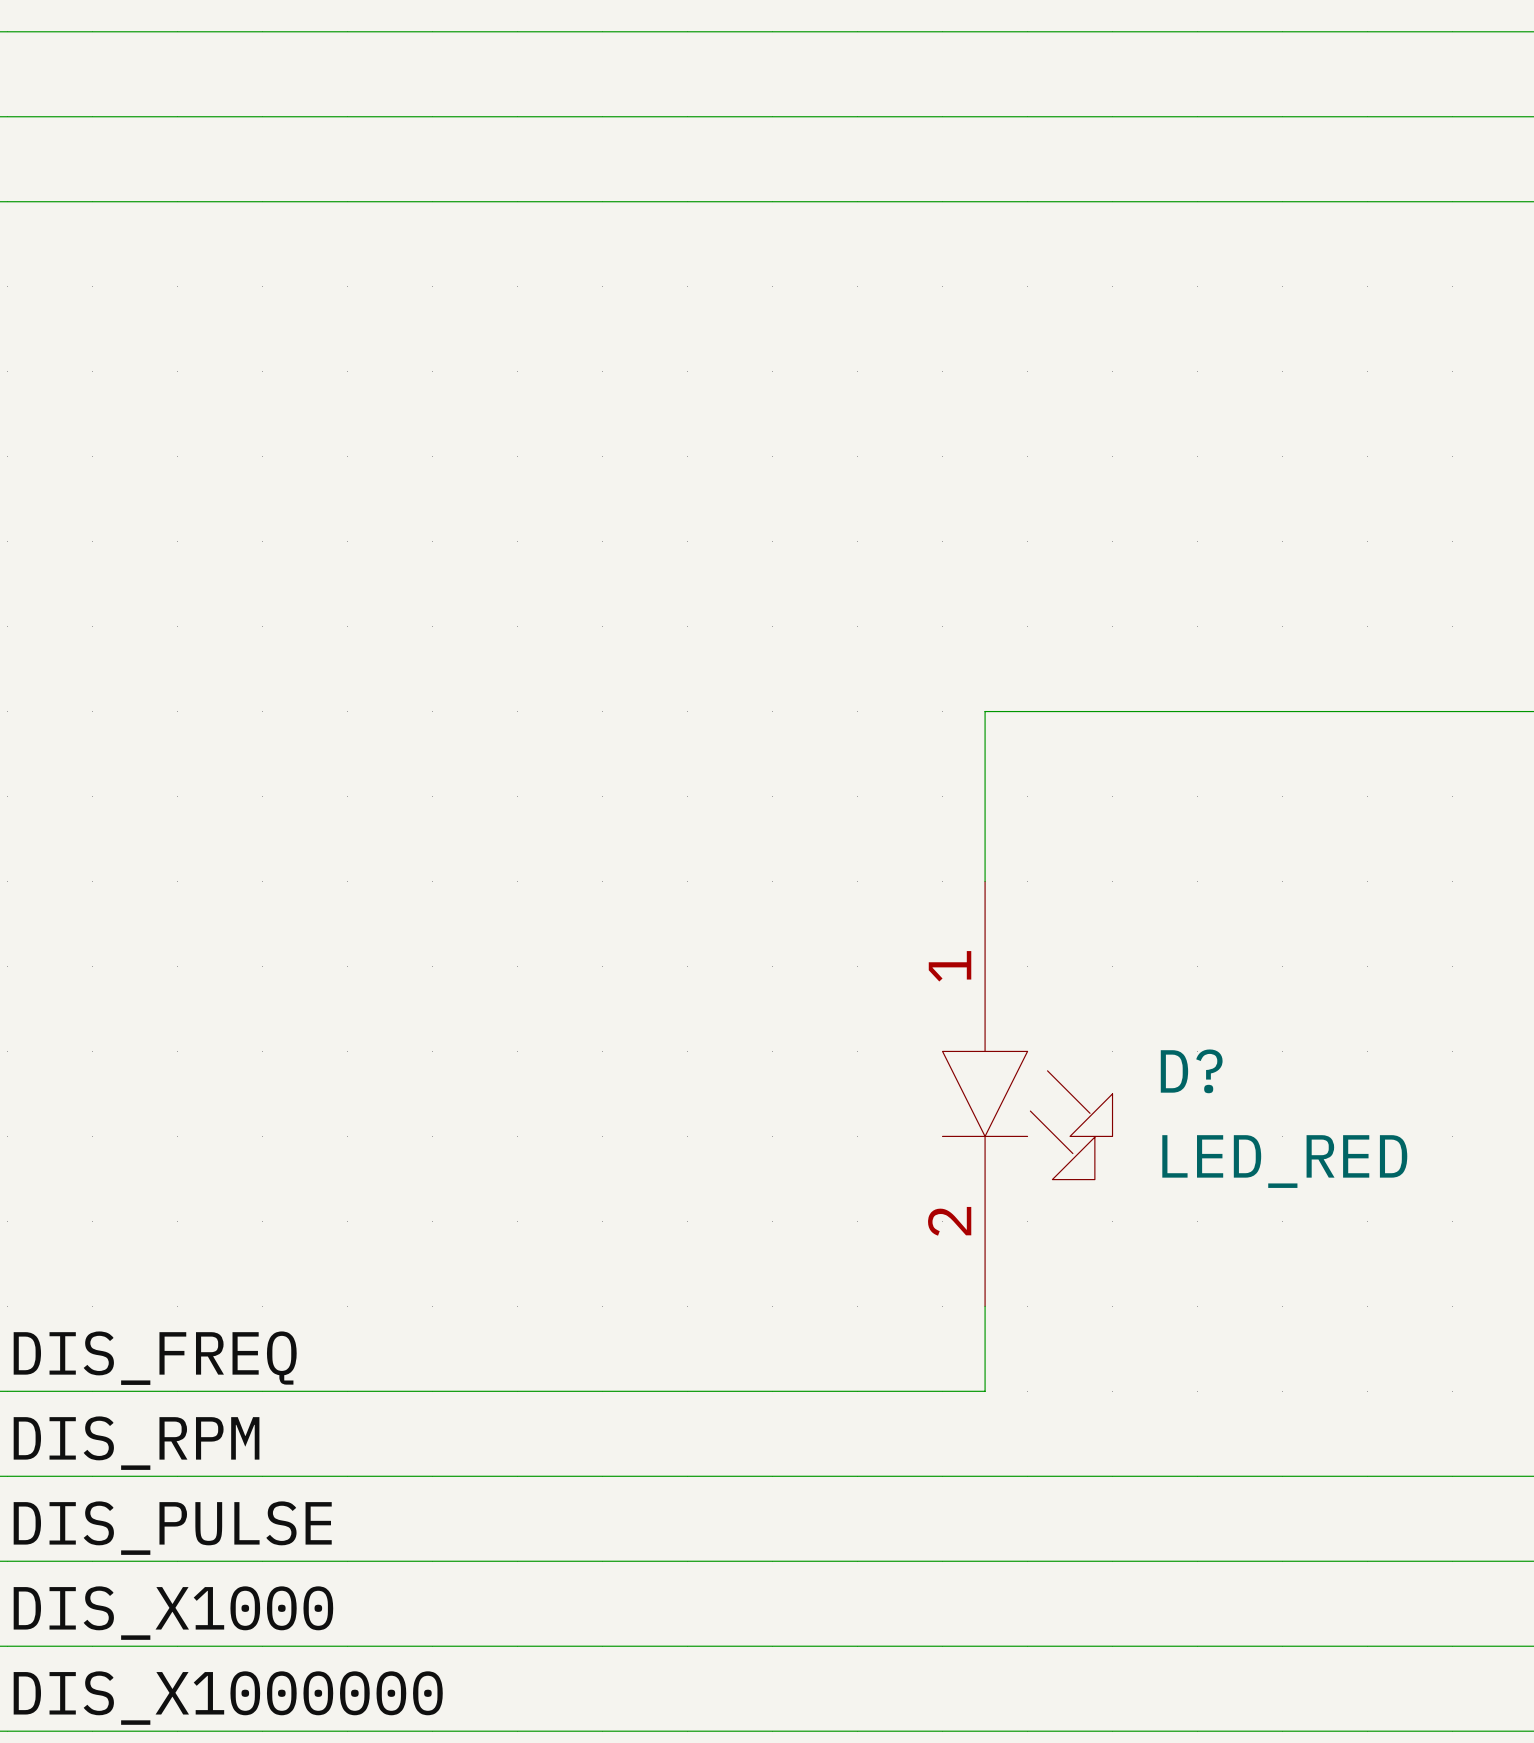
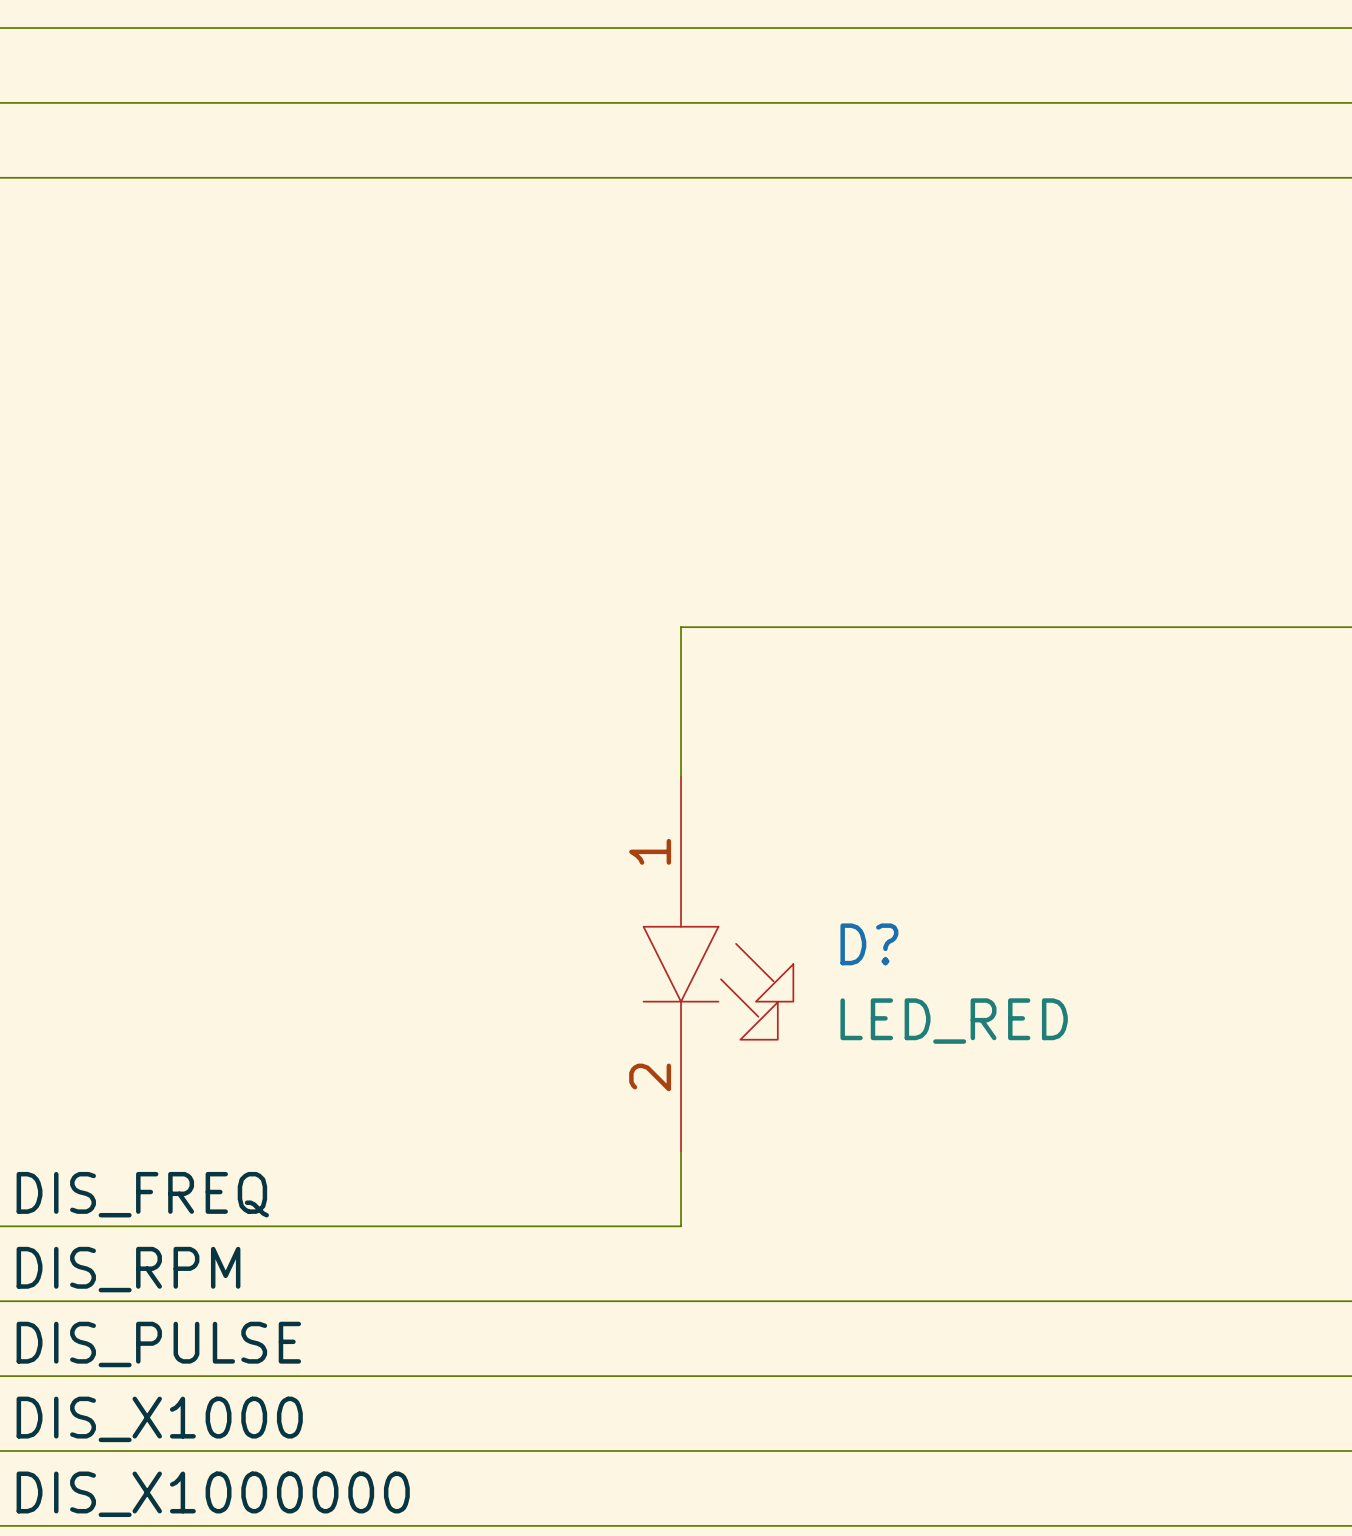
wire: (985, 711) (985, 881) -> (868, 627) (681, 627) (681, 776)
D? position: (1027, 1093) -> (718, 964)
wire: (985, 1306) (985, 1391) (772, 1391) -> (681, 1151) (681, 1226)

